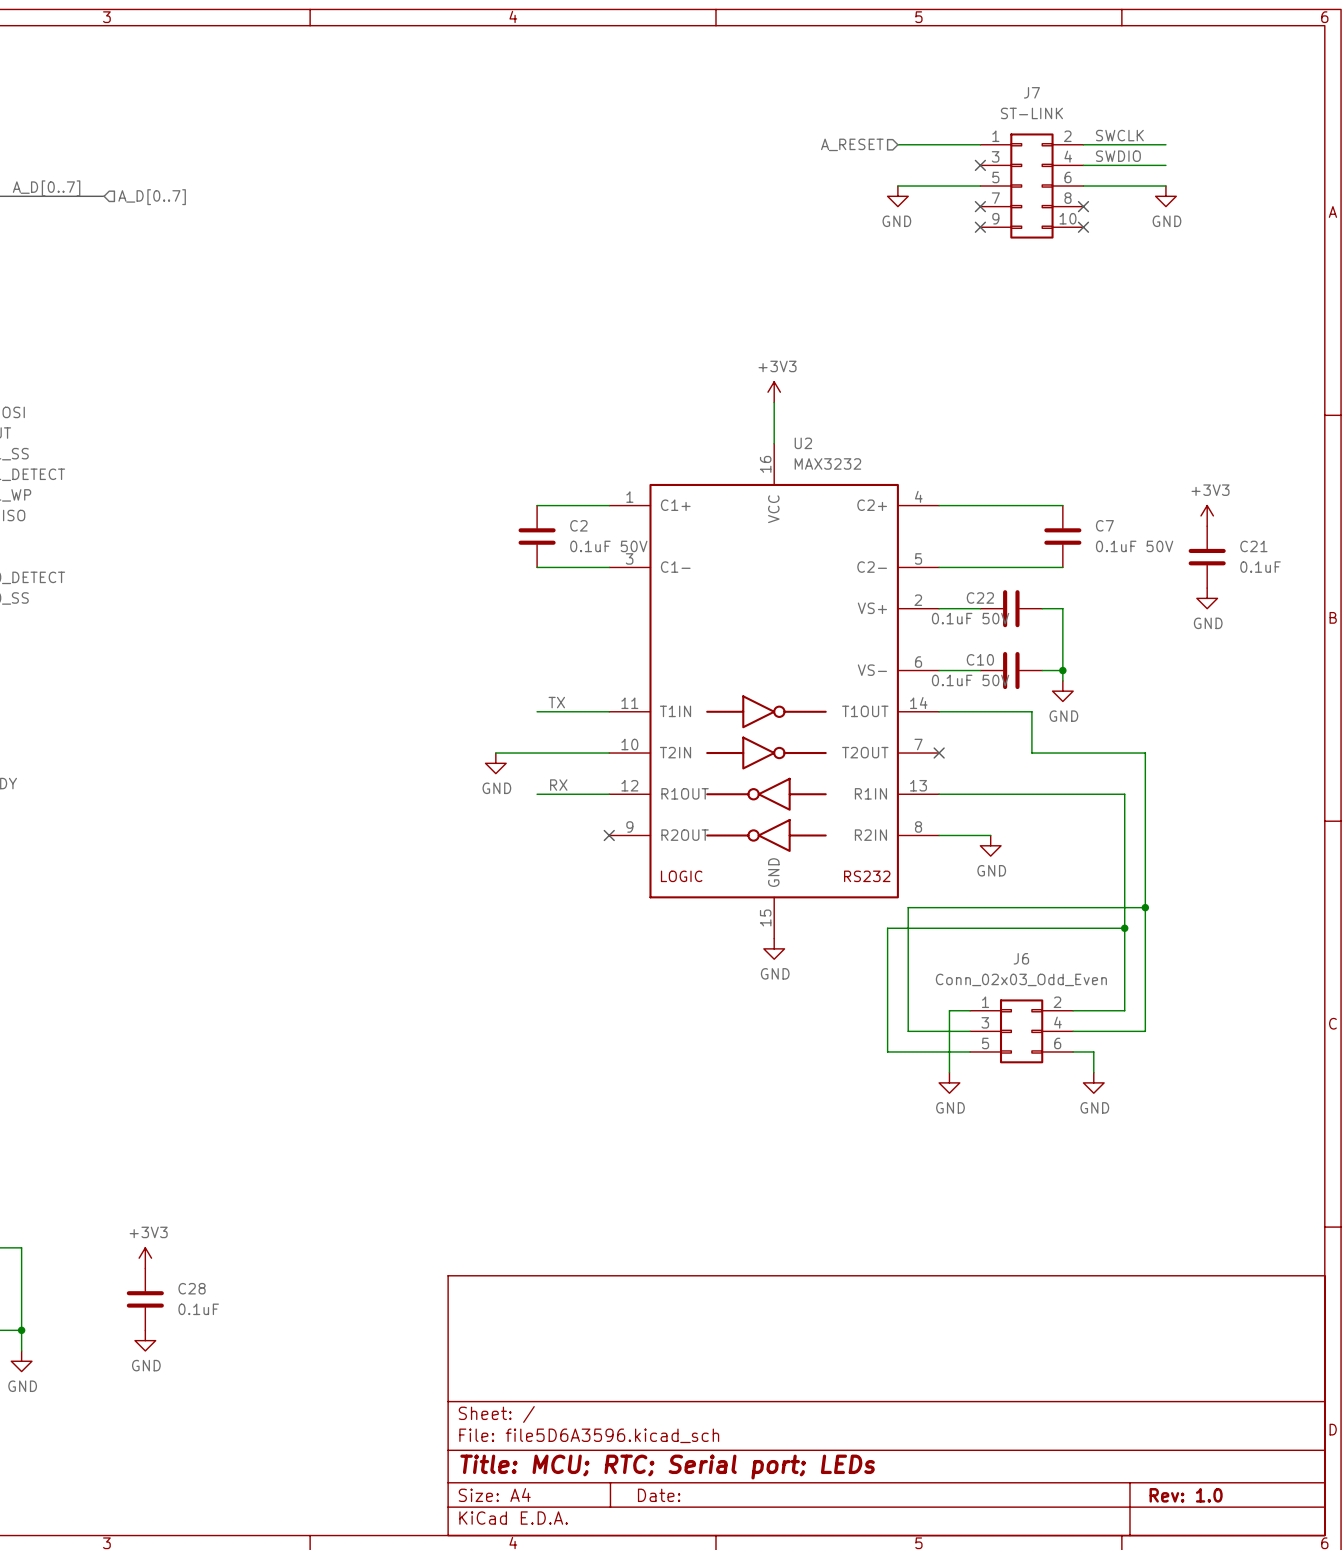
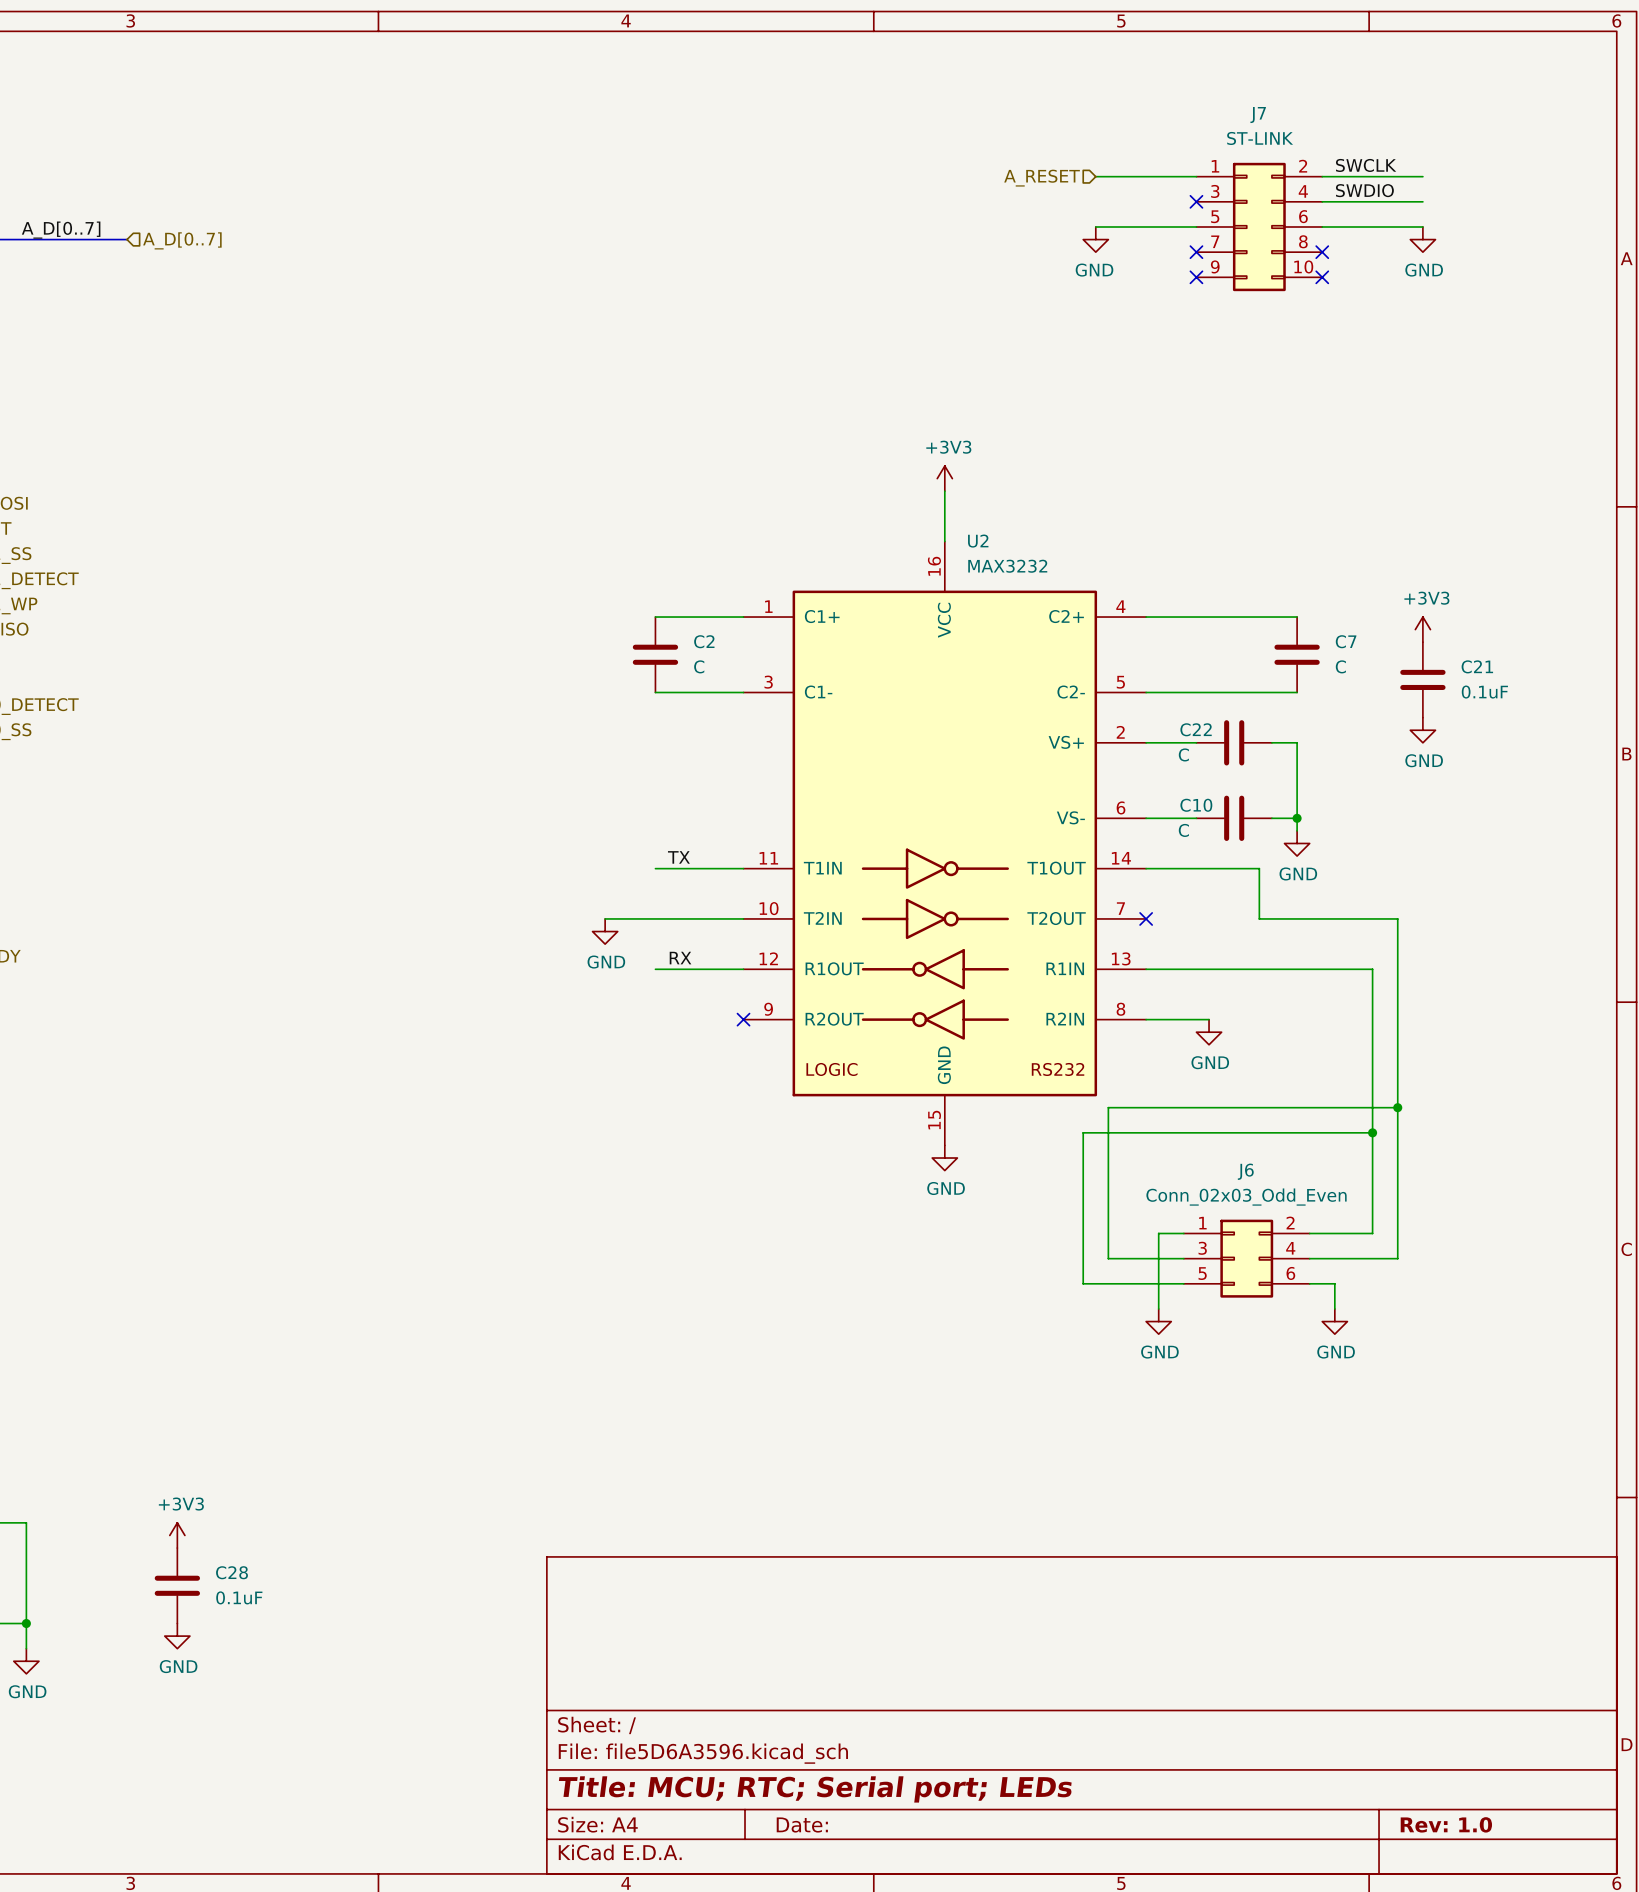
power symbol position: +3V3 (1207, 515) -> +3V3 (1422, 629)
C2 value: 0.1uF 50V (608, 546) -> C (699, 666)
C7 value: 0.1uF 50V (1134, 546) -> C (1340, 666)
C21 position: (1207, 557) -> (1422, 679)
power symbol position: GND (1207, 598) -> GND (1422, 730)
C22 value: 0.1uF 50V (970, 618) -> C (1183, 754)
C10 value: 0.1uF 50V (970, 680) -> C (1183, 830)

